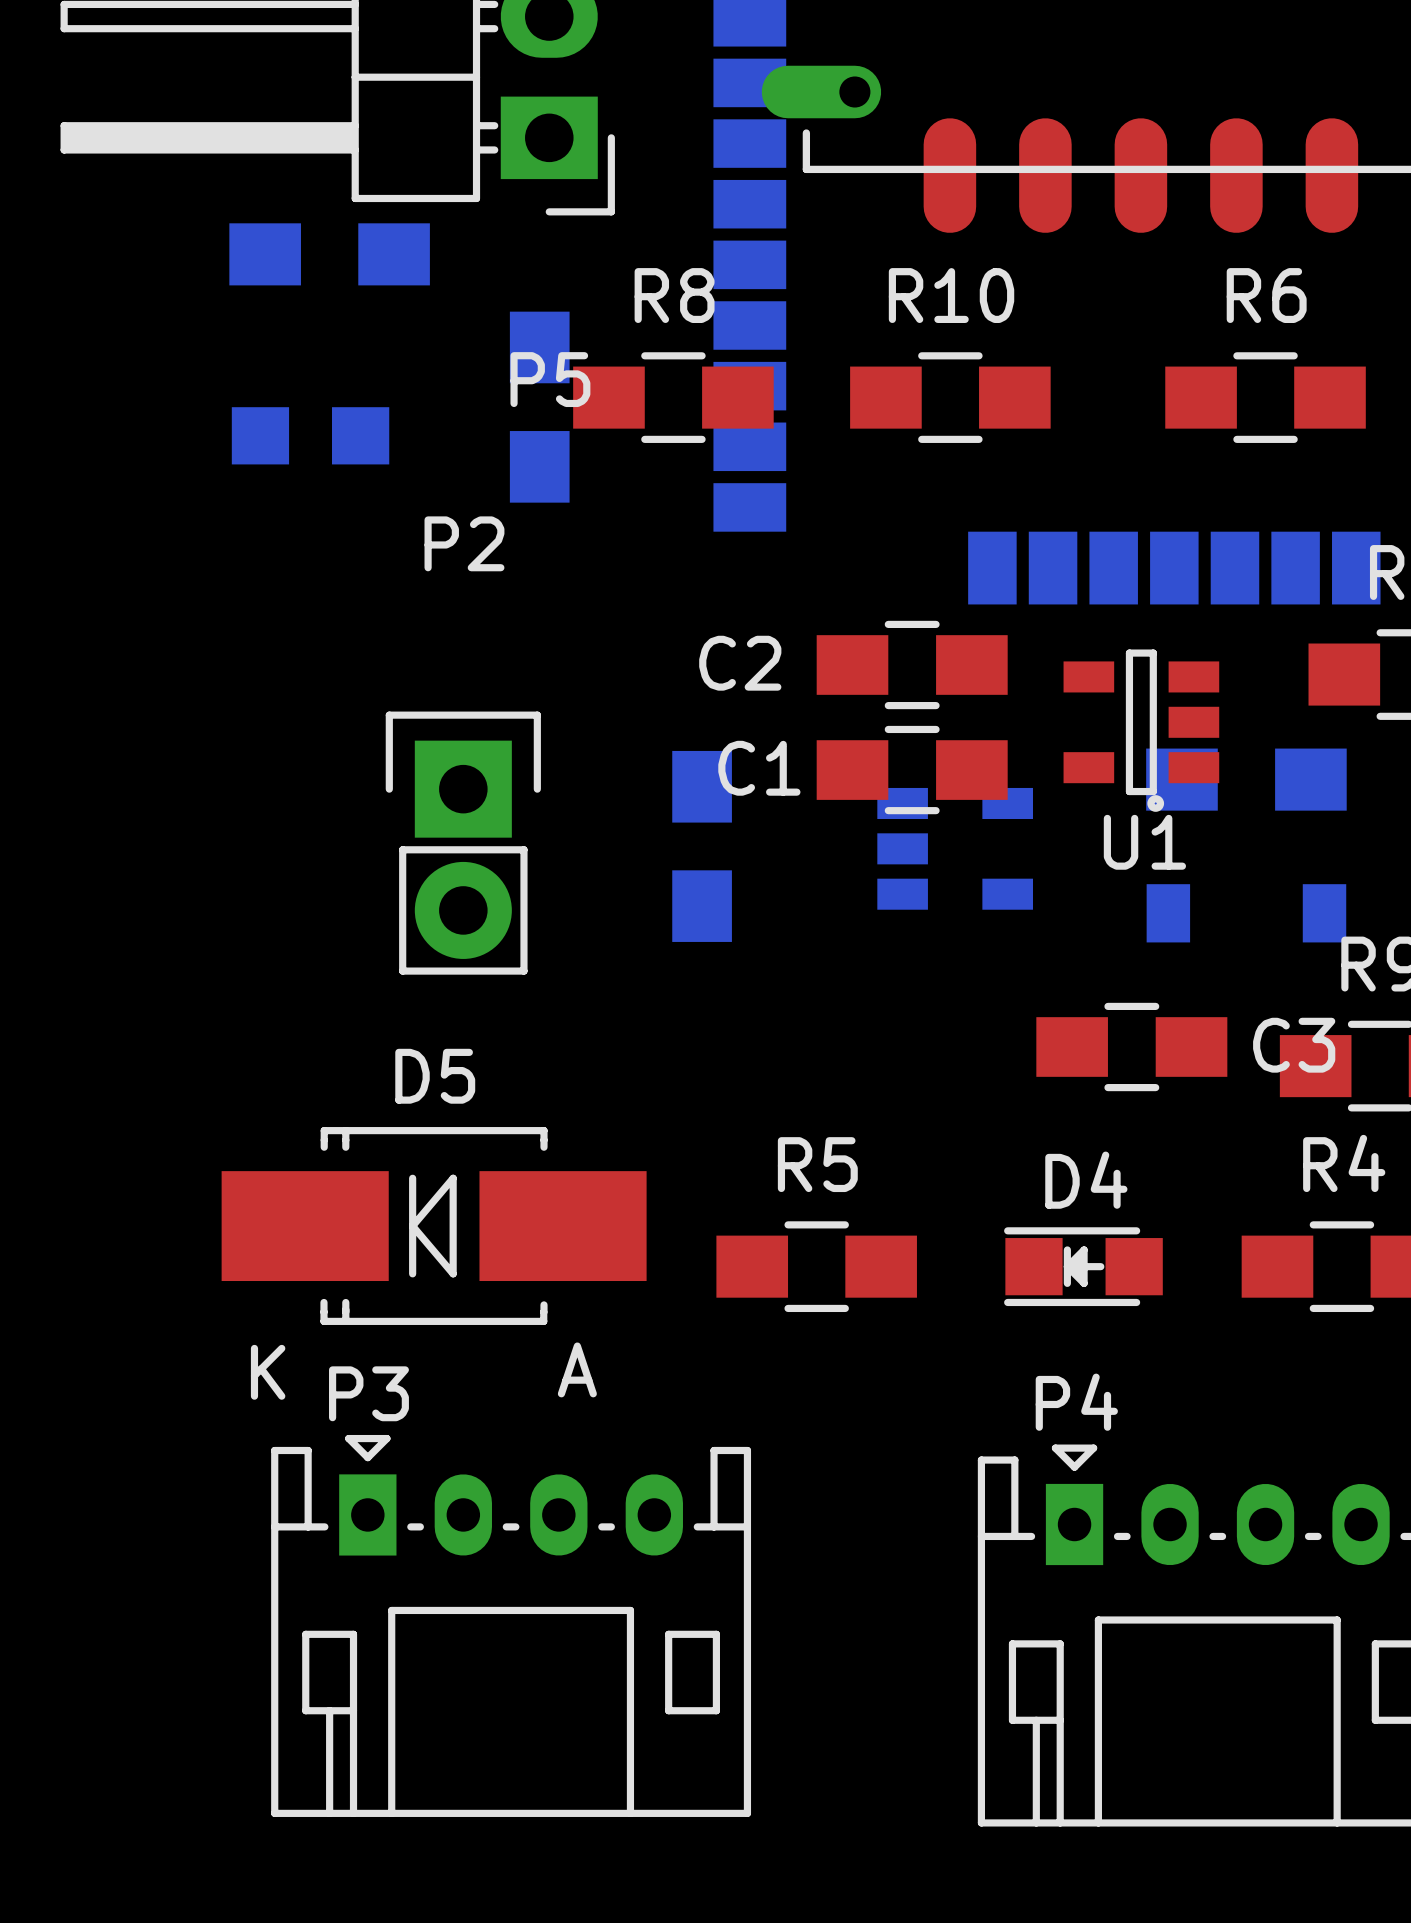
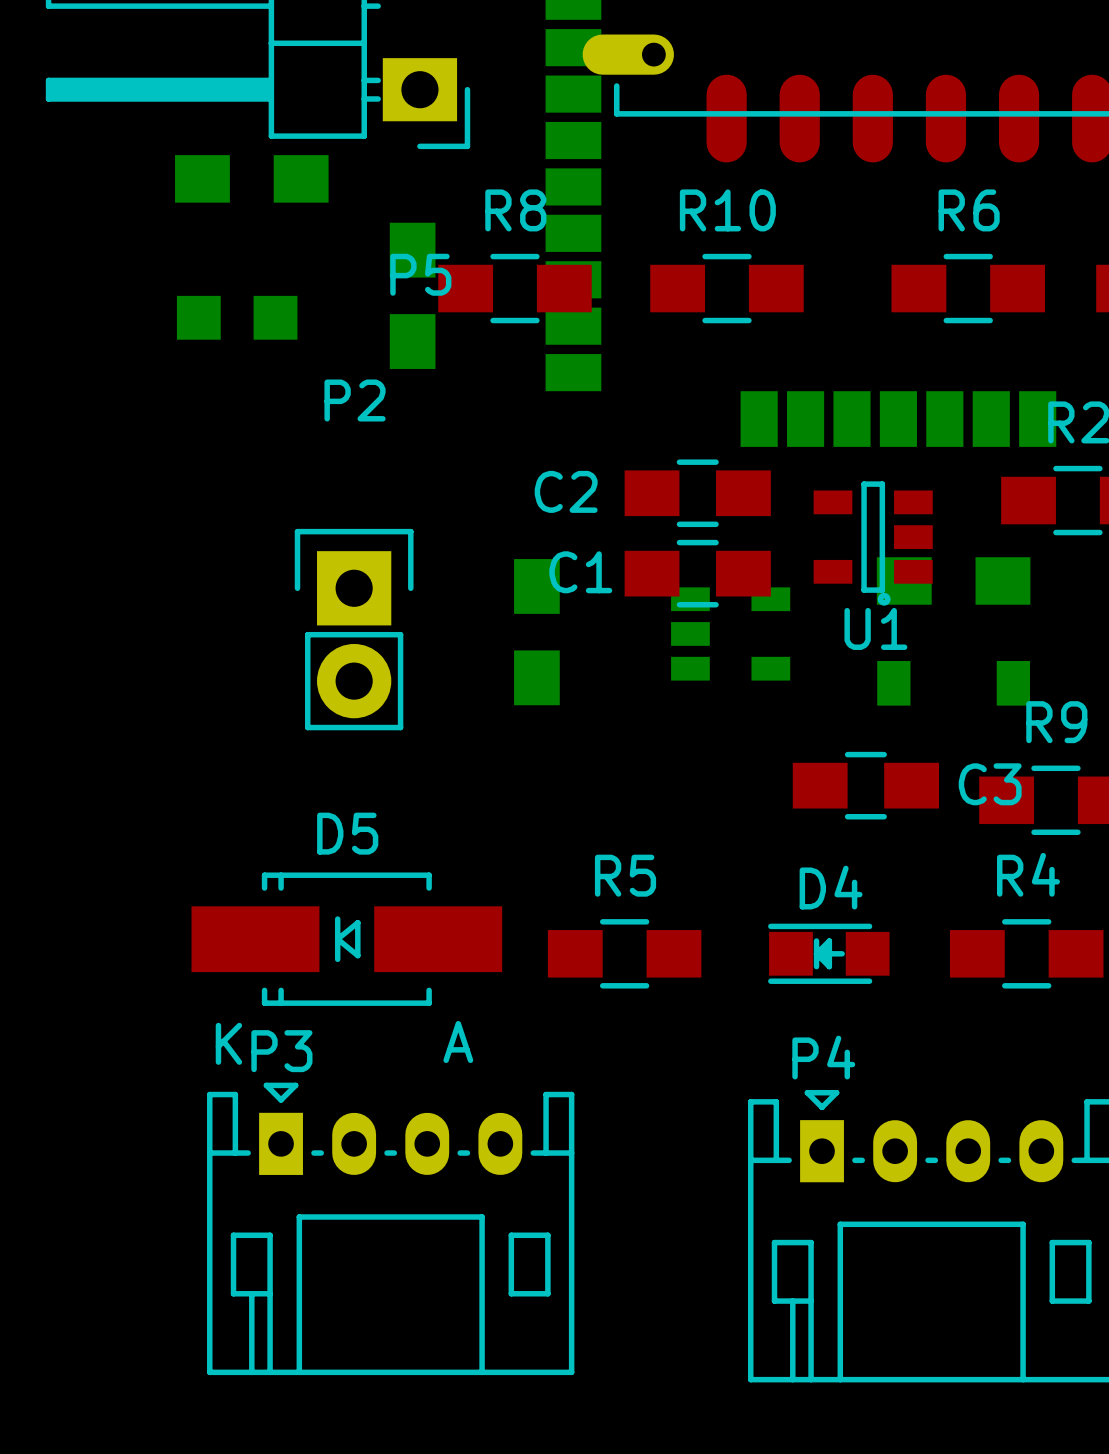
D5 footprint: [221, 1127, 647, 1325] -> [191, 872, 503, 1006]

